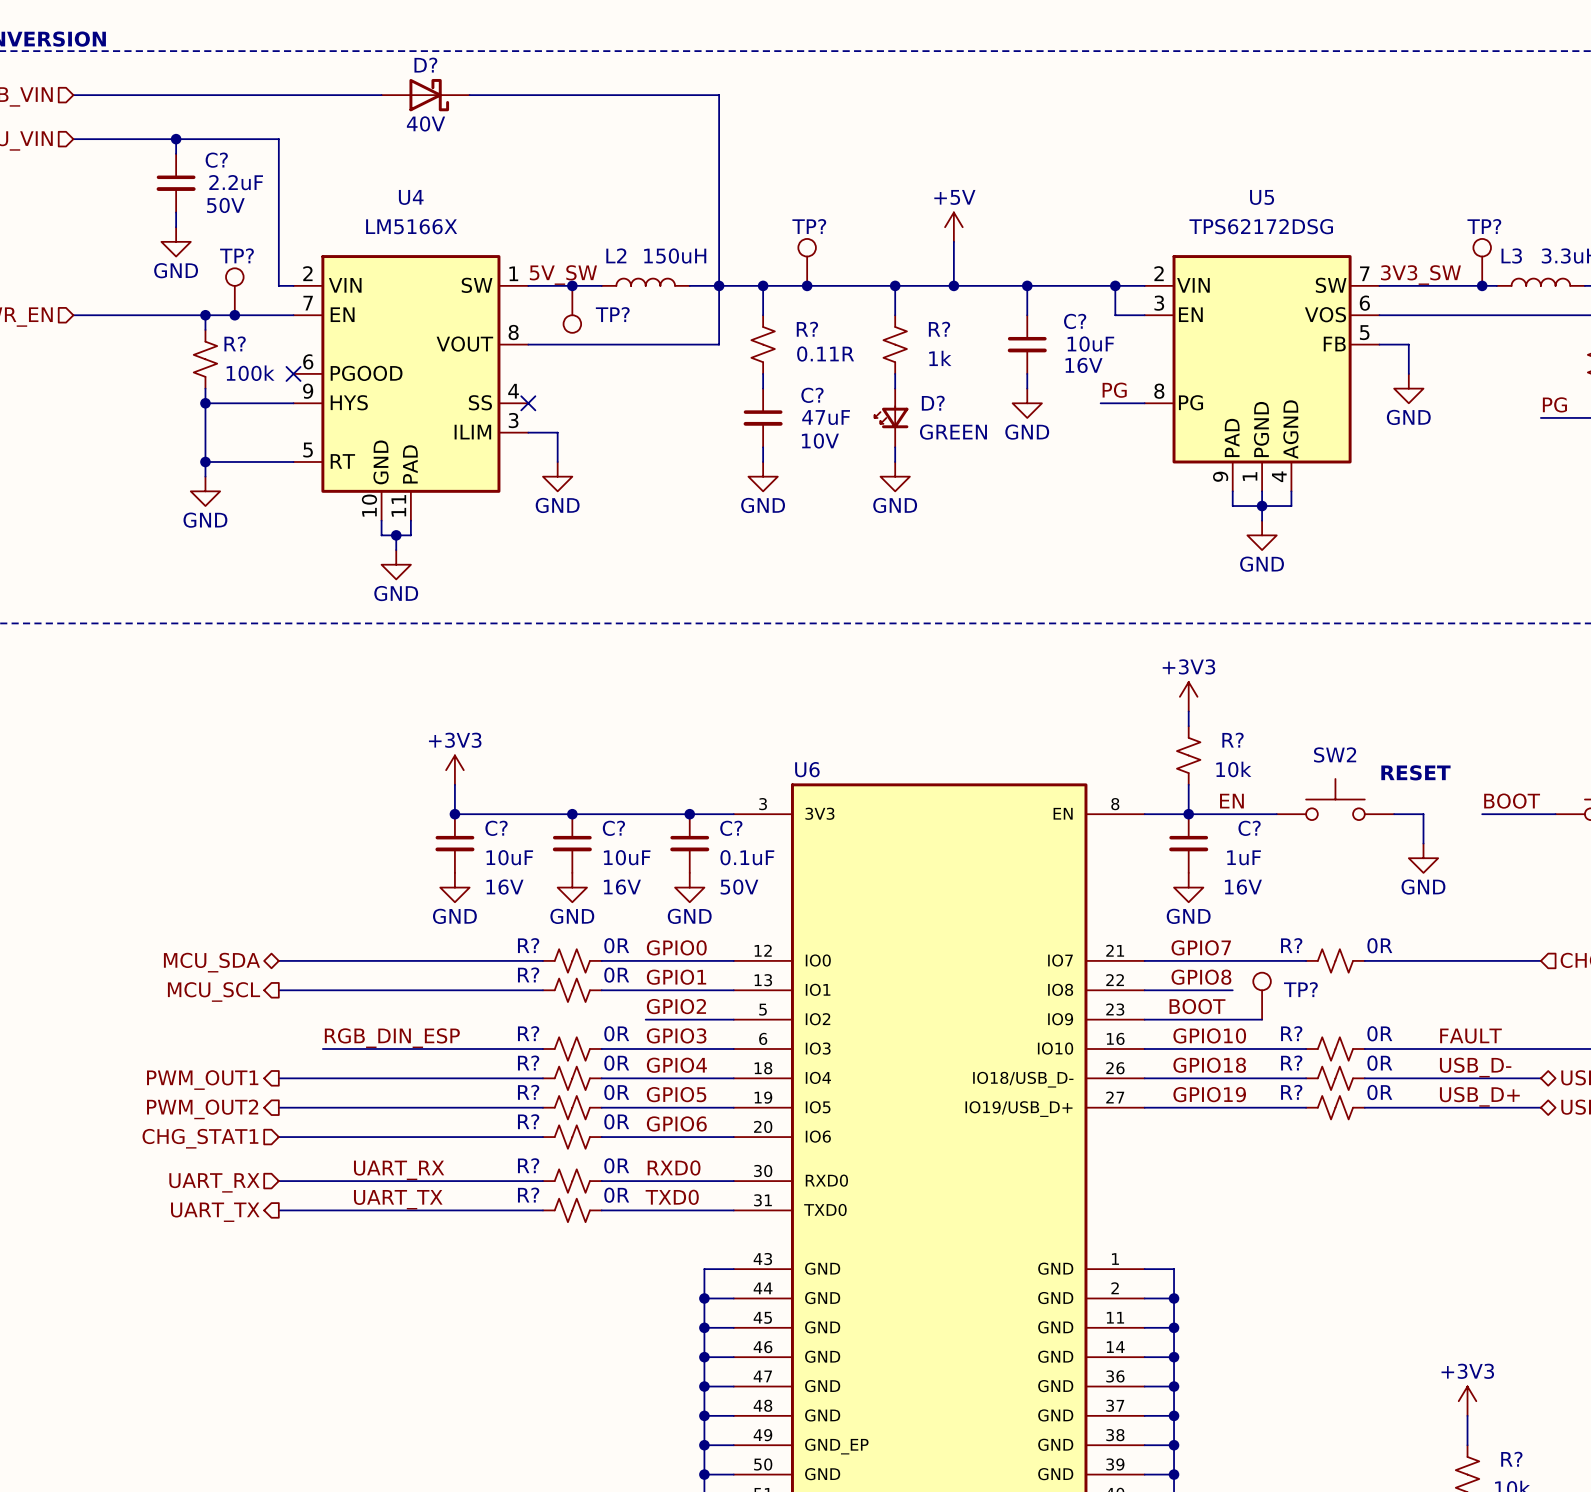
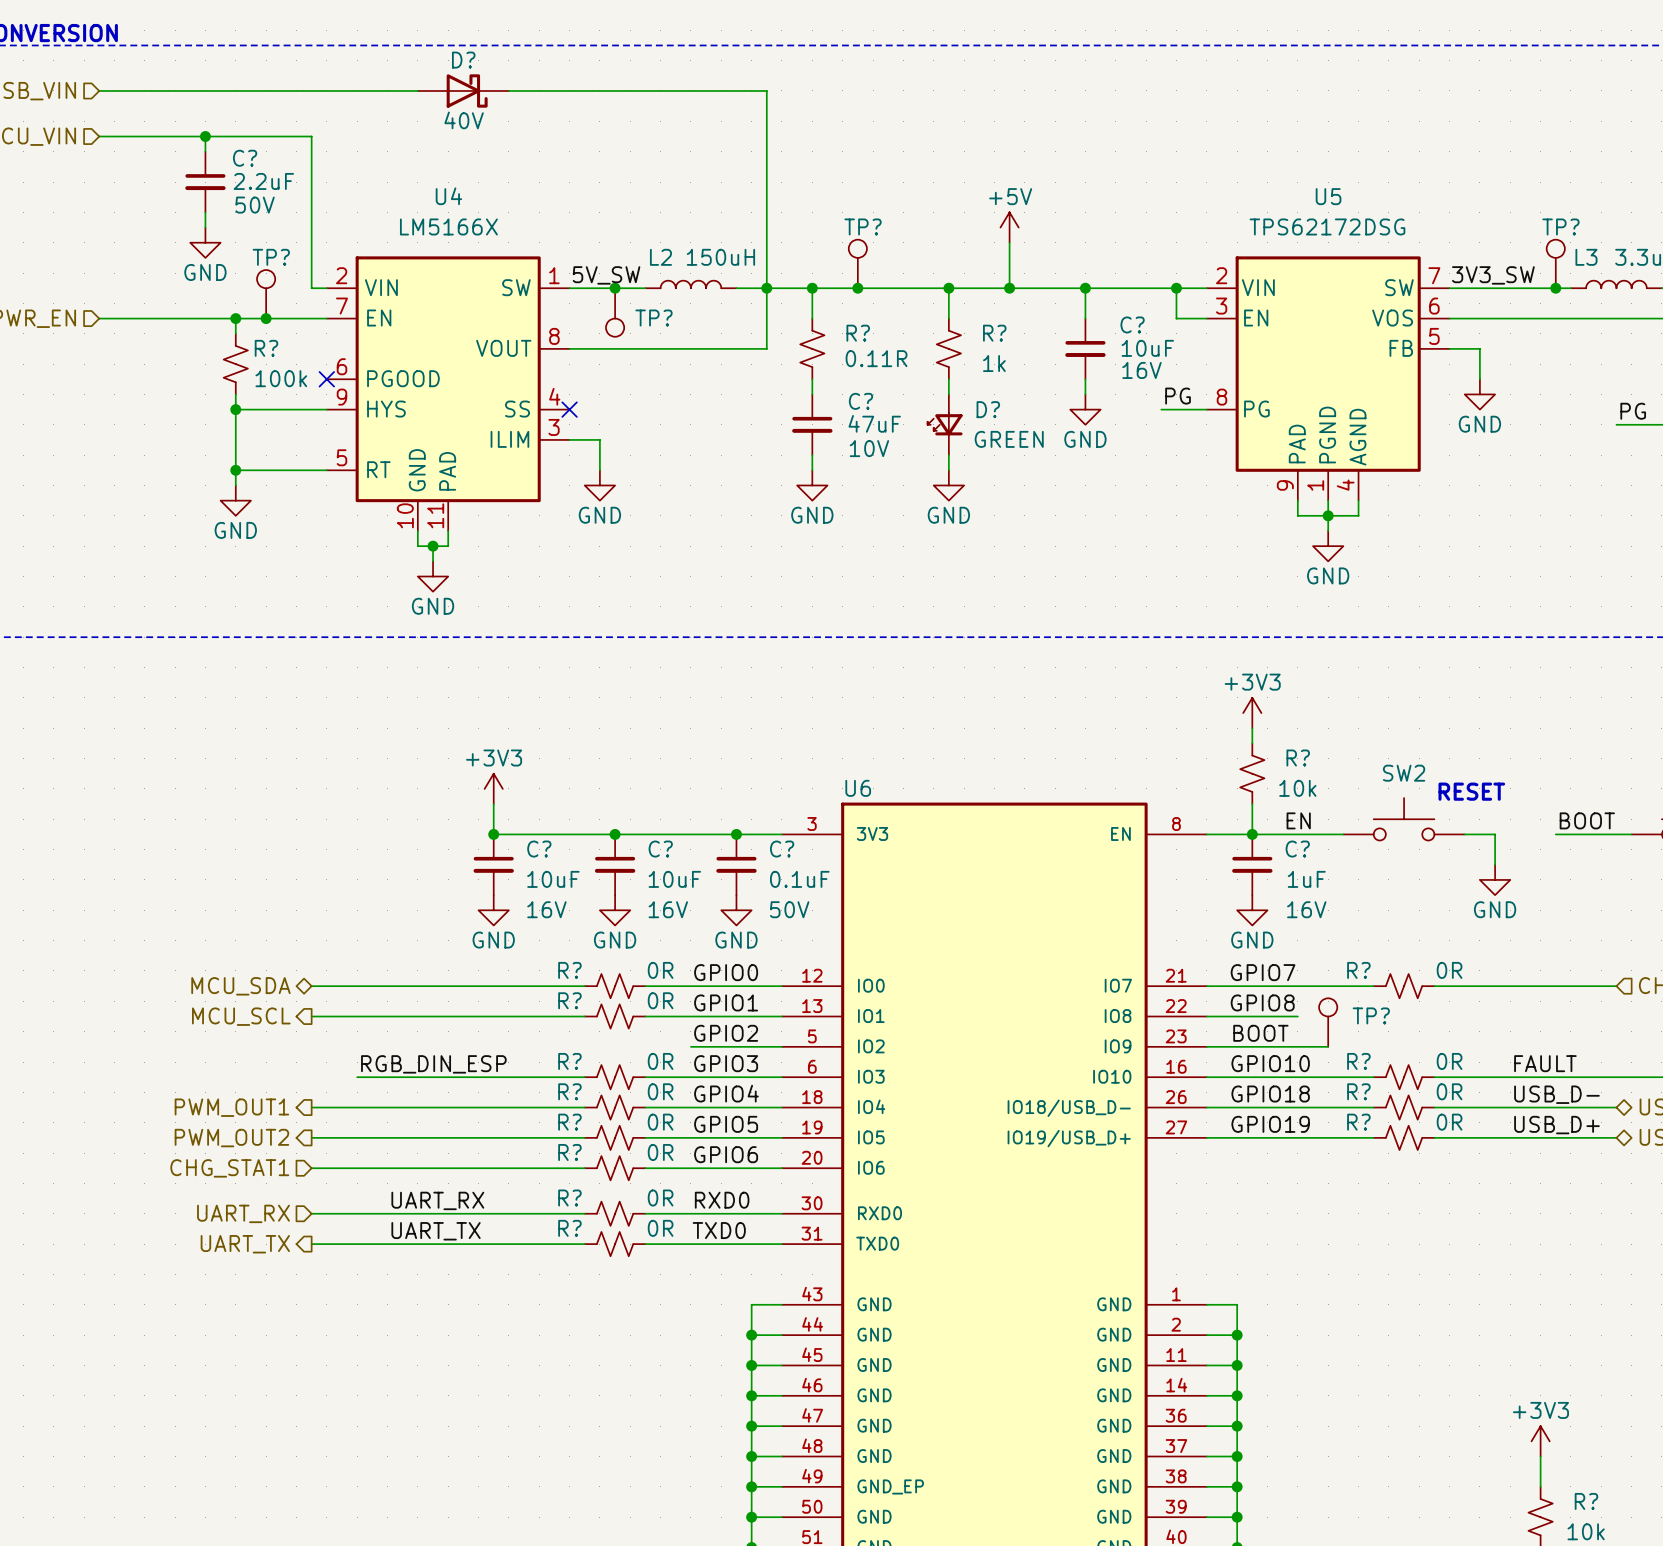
text position: RESET (1415, 772) -> RESET (1471, 791)
C? name position: C? (1249, 828) -> C? (1297, 849)

